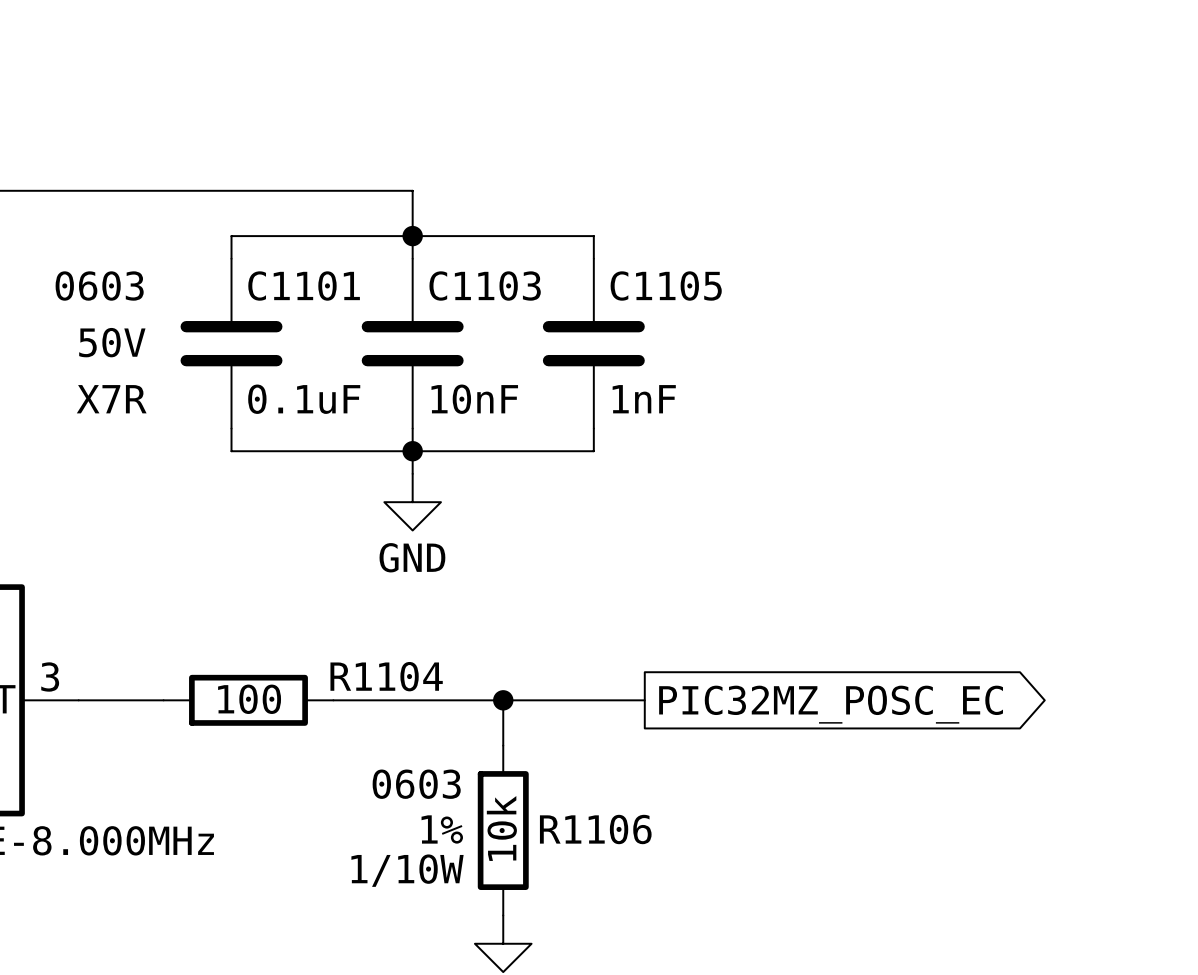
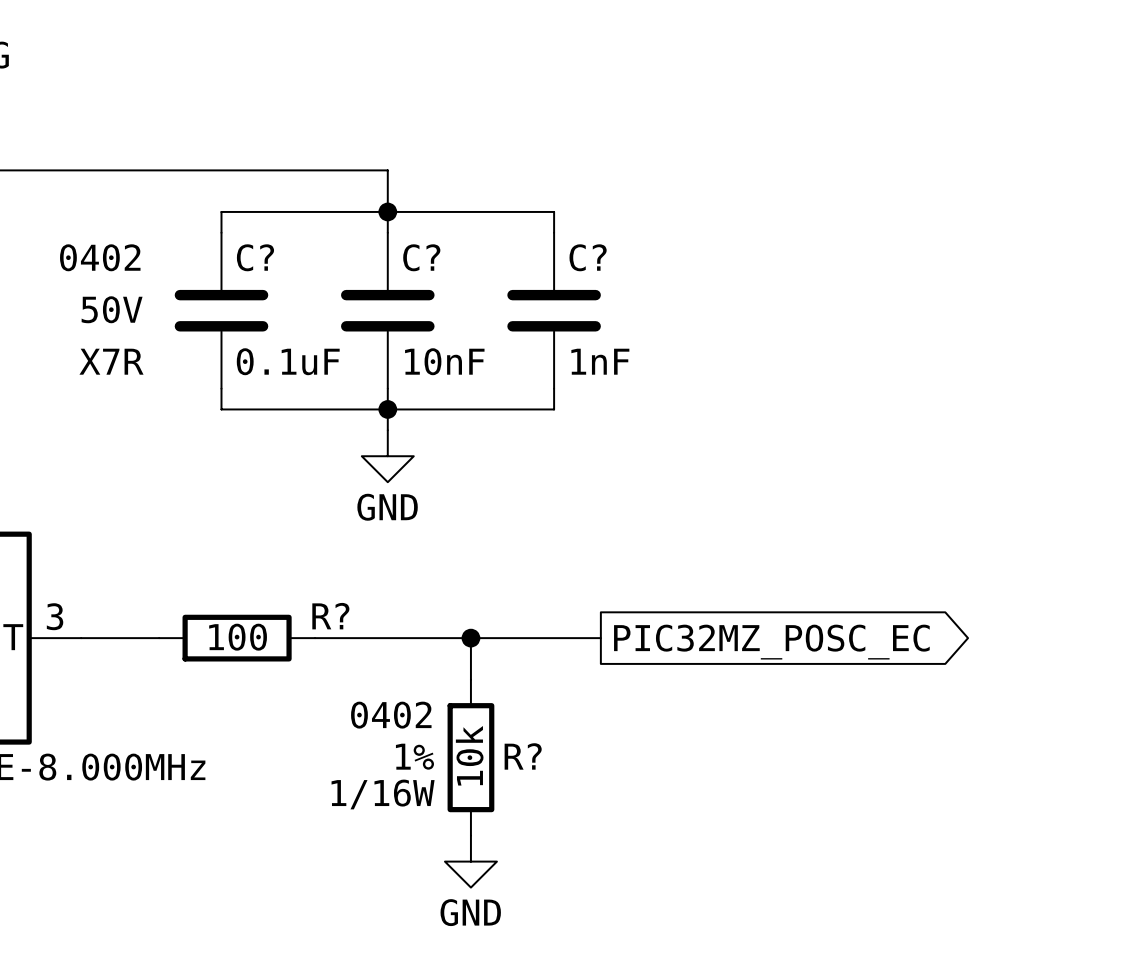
C1101 text: 0603 (99, 286) -> 0402 (100, 257)
C1101 name: C1101 (304, 286) -> C? (255, 257)
C1103 name: C1103 (485, 286) -> C? (421, 257)
C1105 name: C1105 (666, 286) -> C? (588, 257)
R1104 name: R1104 (386, 676) -> R? (330, 616)
R1106 text: 0603 (416, 784) -> 0402 (391, 715)
R1106 name: R1106 (595, 829) -> R? (523, 756)
R1106 text: 1/10W (407, 870) -> 1/16W (383, 794)

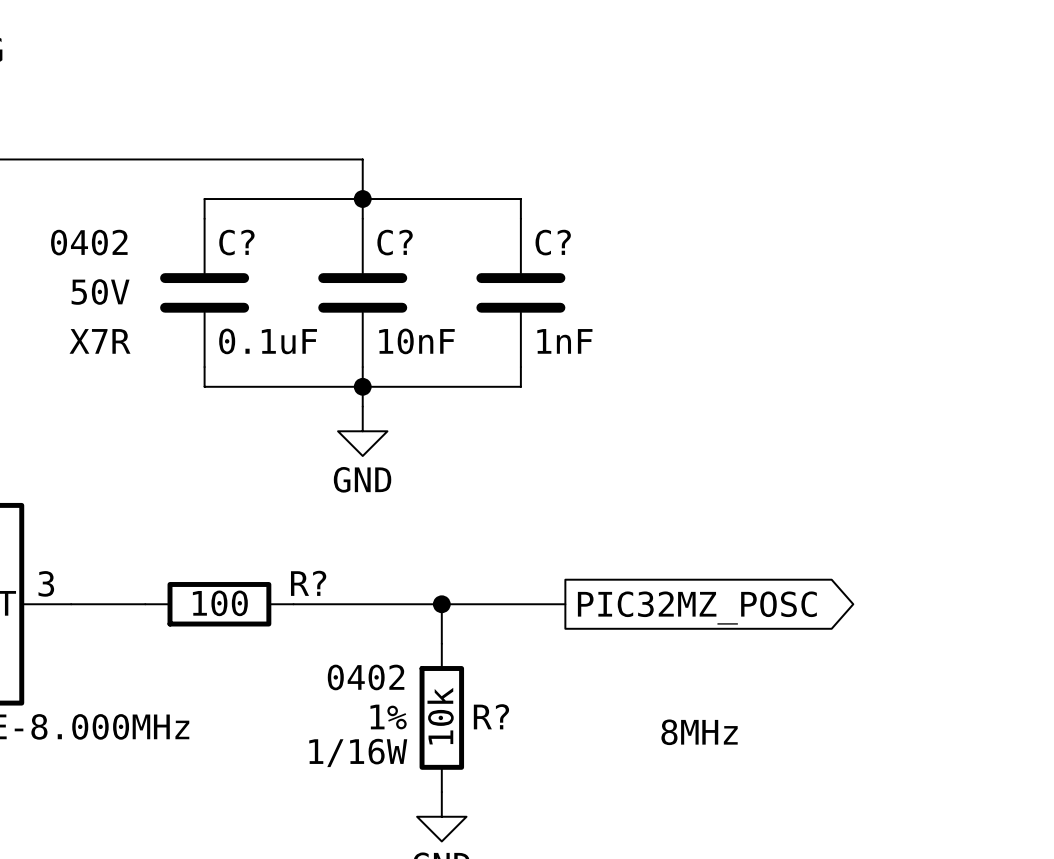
global label: PIC32MZ_POSC_EC (771, 642) -> PIC32MZ_POSC (697, 608)
text: none -> 8MHz (699, 732)

